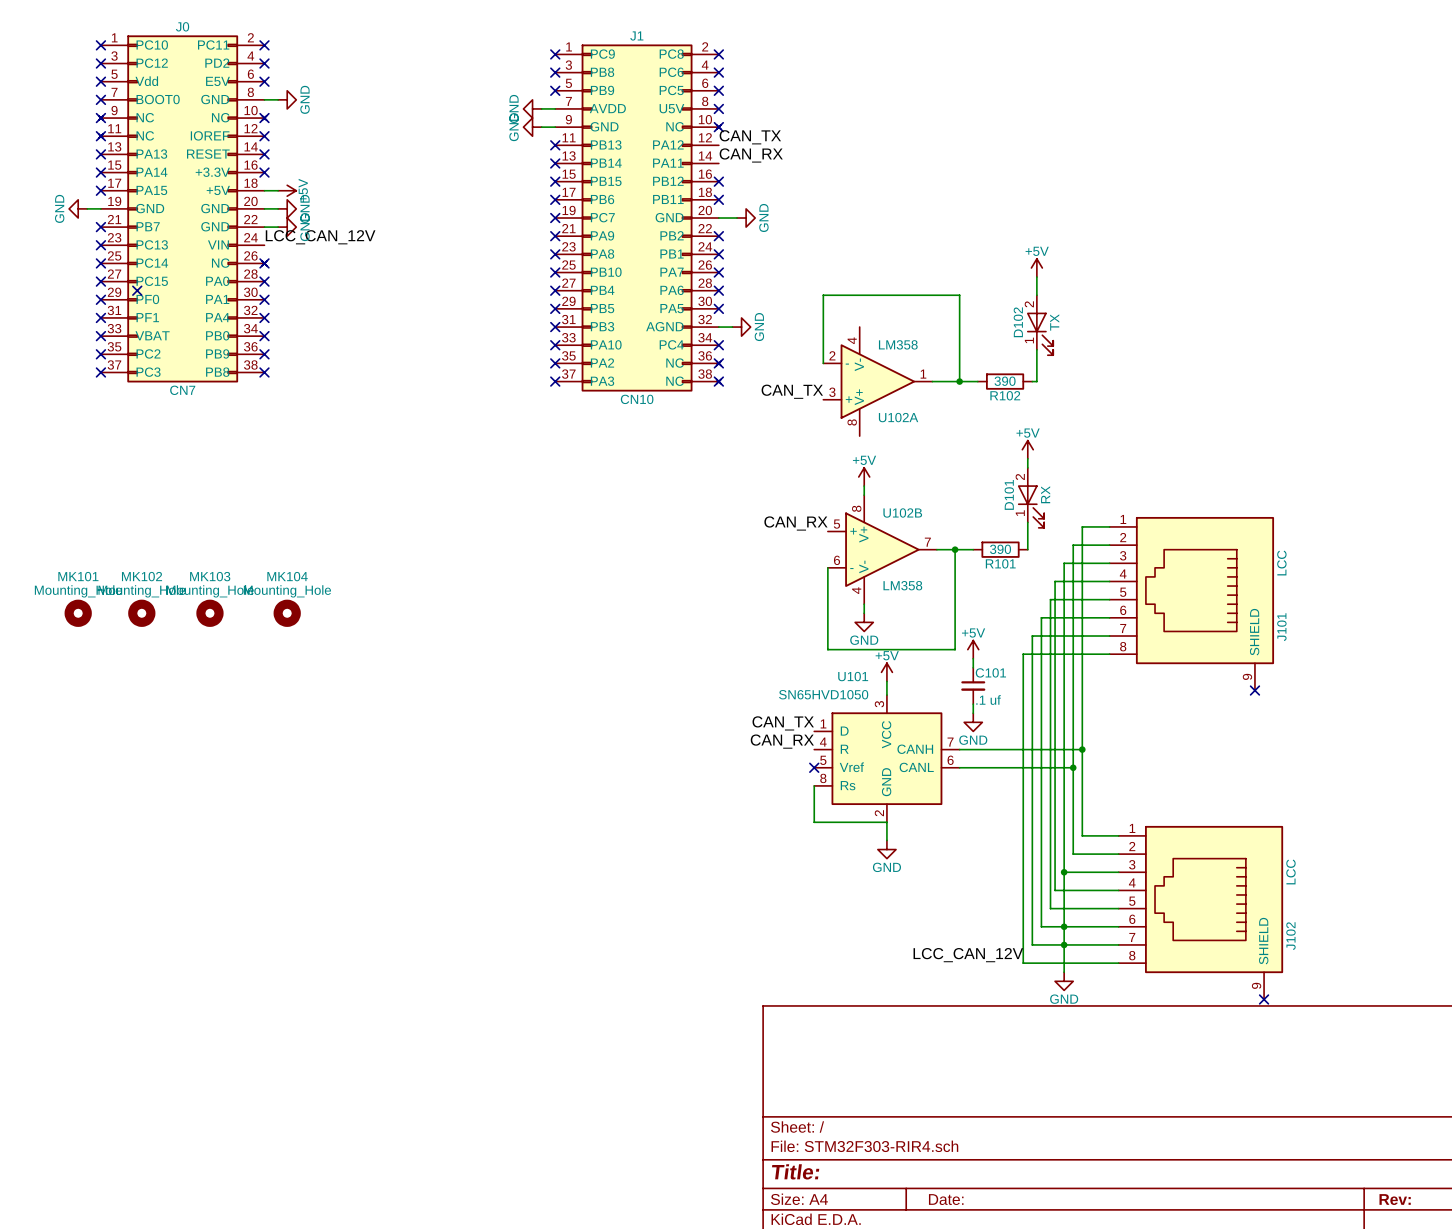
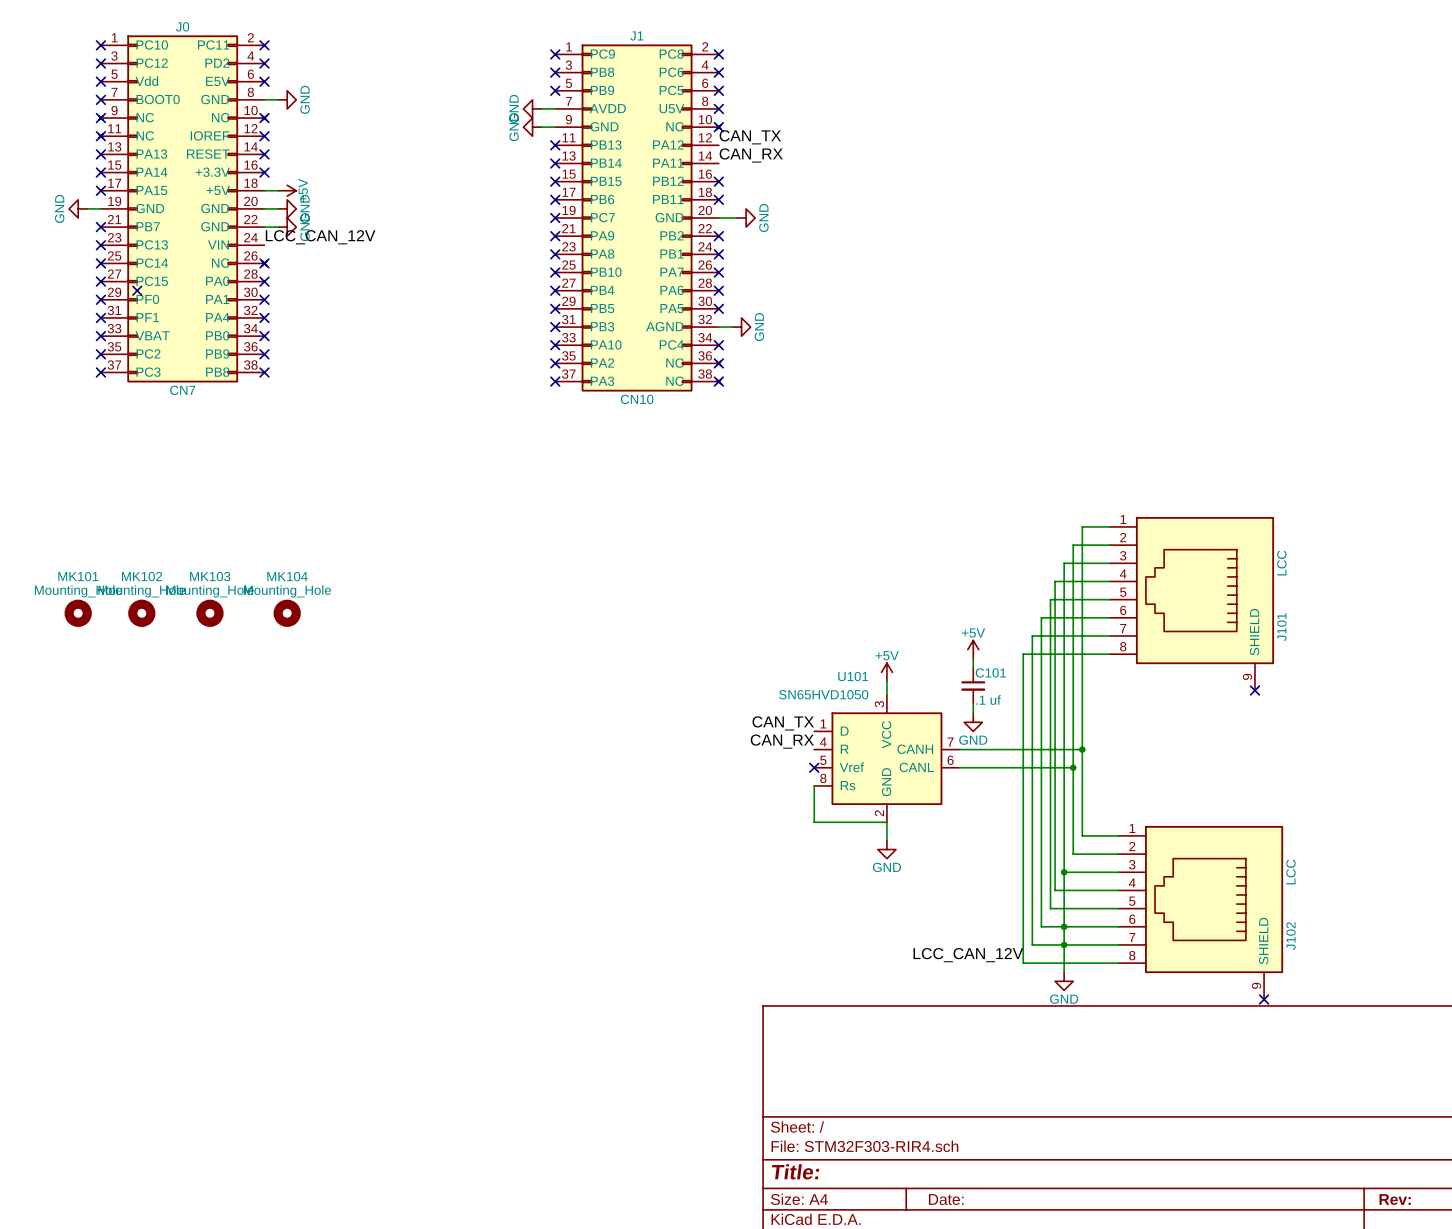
power symbol: +5V (1036, 267) -> none
wire: (1036, 277) (1036, 295) -> none
D102: TX (1040, 325) -> none
wire: (1036, 349) (1036, 381) (1032, 381) -> none
wire: (823, 363) (823, 295) (959, 295) (959, 381) -> none
U102A: LM358 (877, 381) -> none
wire: (932, 381) (977, 381) -> none
junction: (959, 381) -> none
R102: 390 (1005, 381) -> none
label: CAN_TX (792, 391) -> none
power symbol: +5V (1027, 449) -> none
wire: (1027, 458) (1027, 467) -> none
power symbol: +5V (864, 476) -> none
wire: (864, 486) (864, 495) -> none
D101: RX (1031, 497) -> none
wire: (1027, 522) (1027, 549) -> none
label: CAN_RX (795, 523) -> none
U102B: LM358 (882, 549) -> none
wire: (936, 549) (973, 549) -> none
wire: (955, 549) (955, 649) (827, 649) (827, 567) -> none
junction: (955, 549) -> none
R101: 390 (1000, 549) -> none
wire: (864, 604) (864, 613) -> none
power symbol: GND (864, 622) -> none

